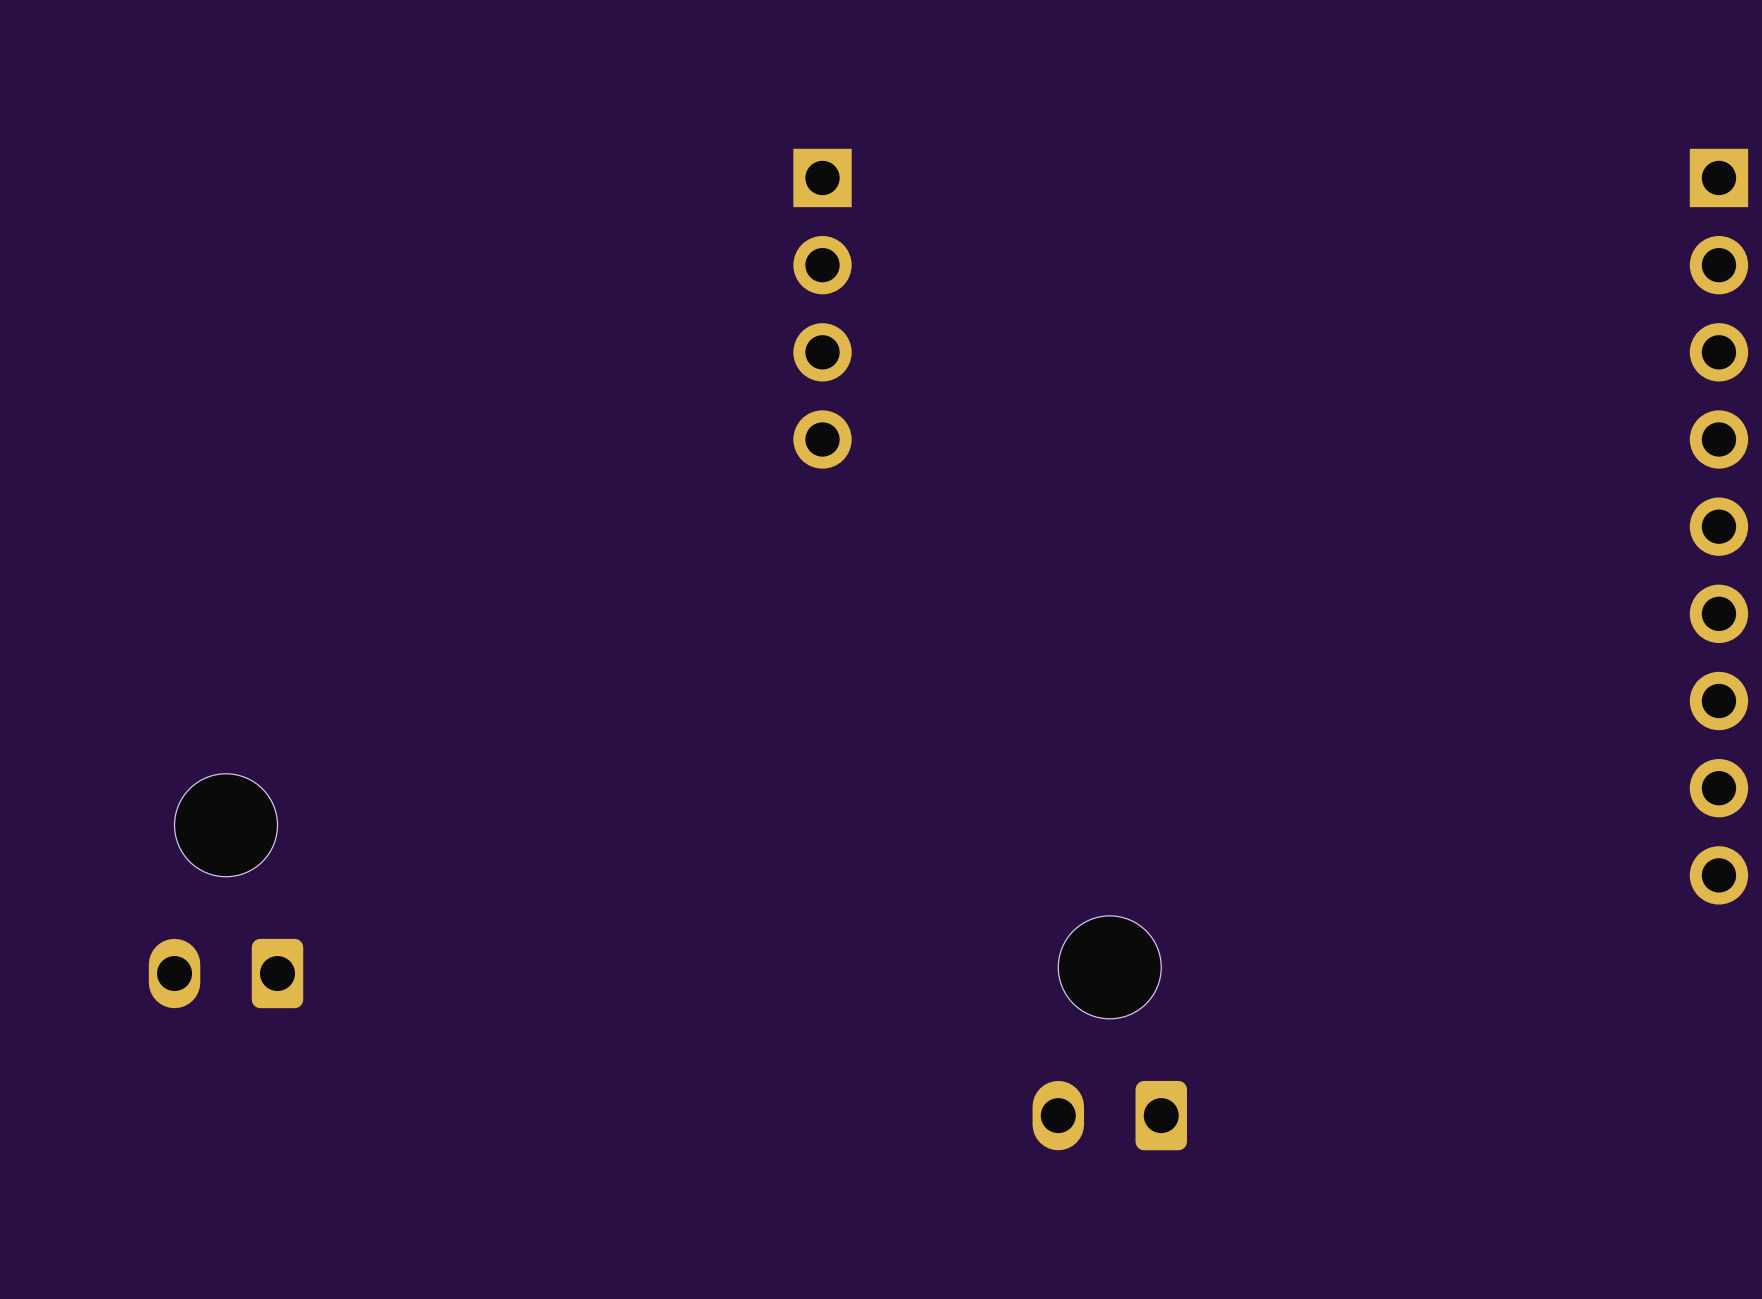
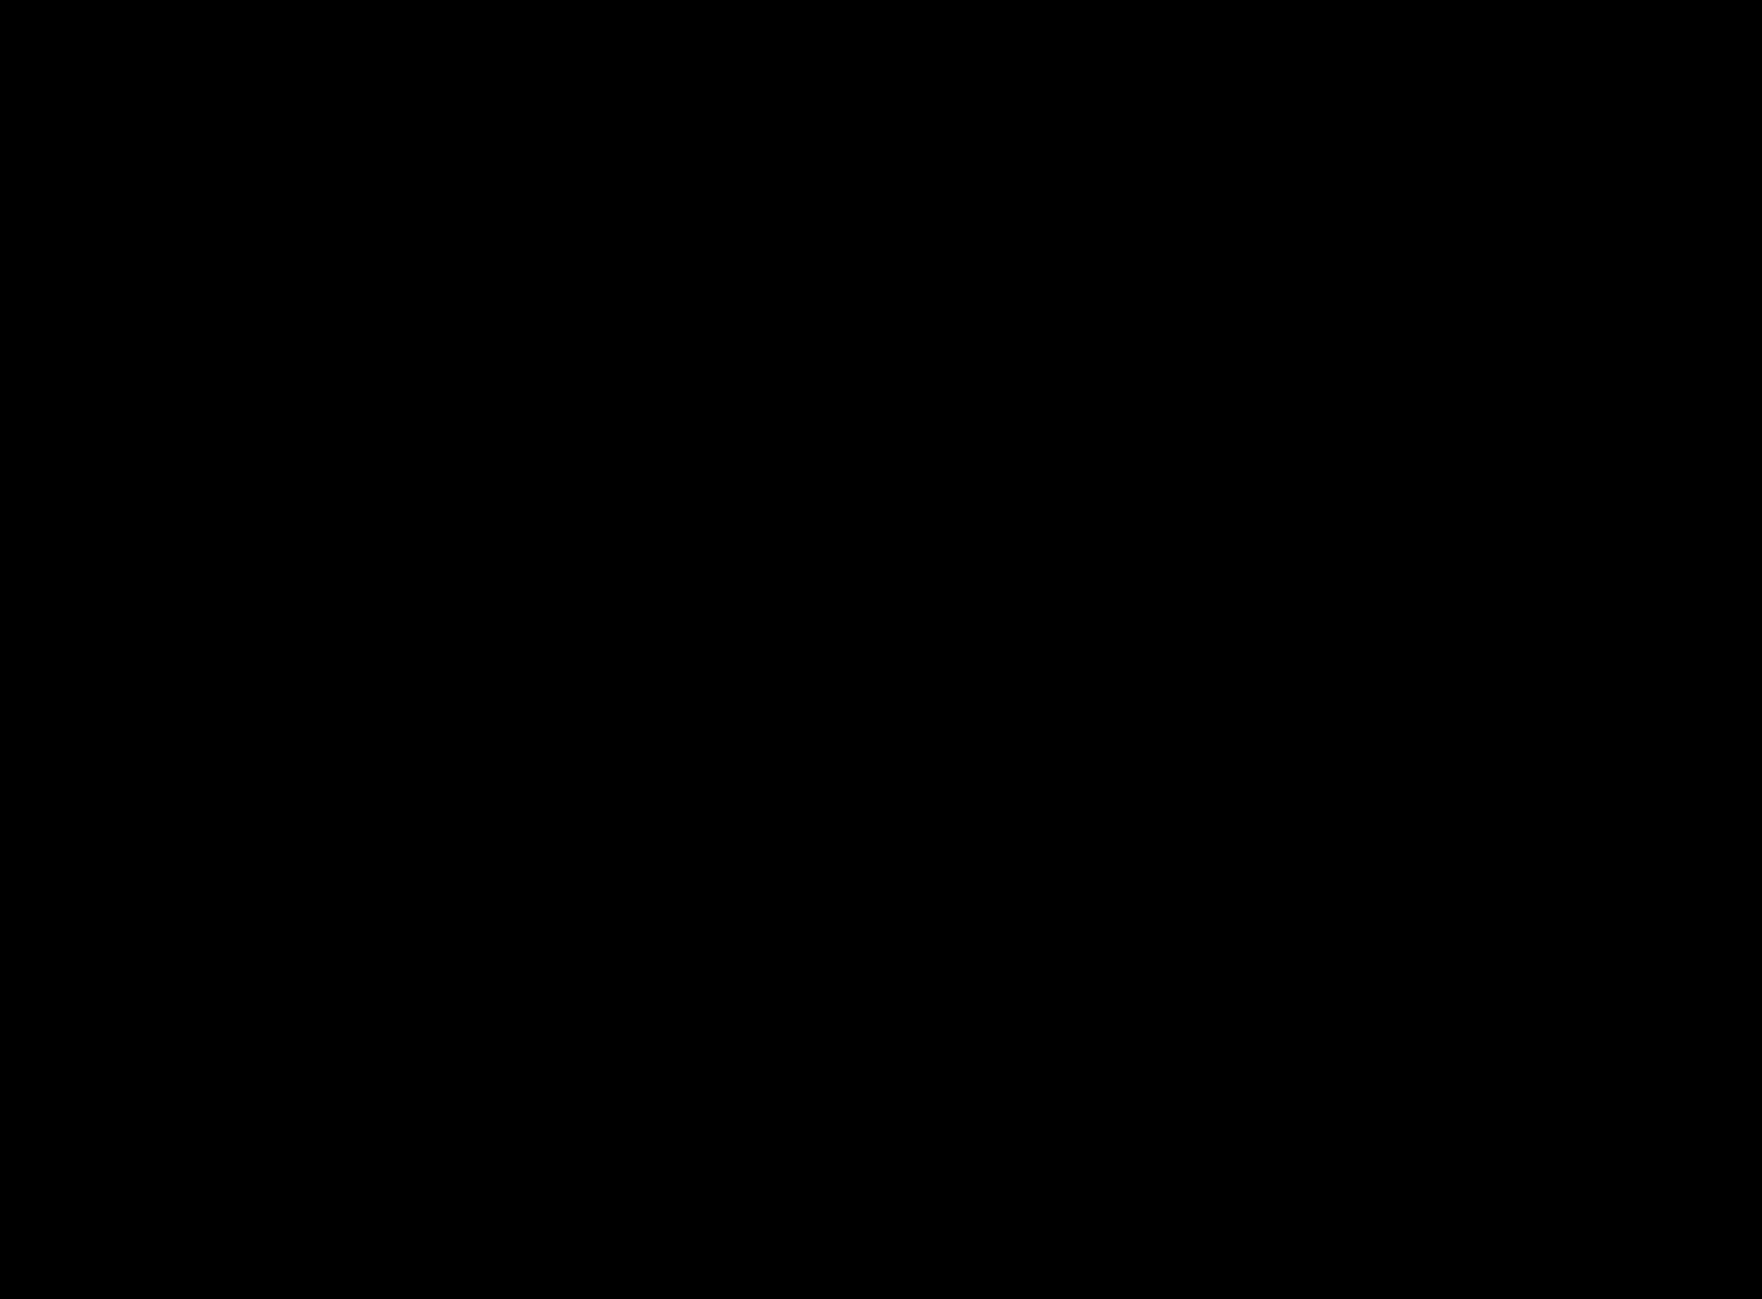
part: (822, 308) -> none
part: (1718, 526) -> none
part: (226, 890) -> none
part: (1109, 1033) -> none

